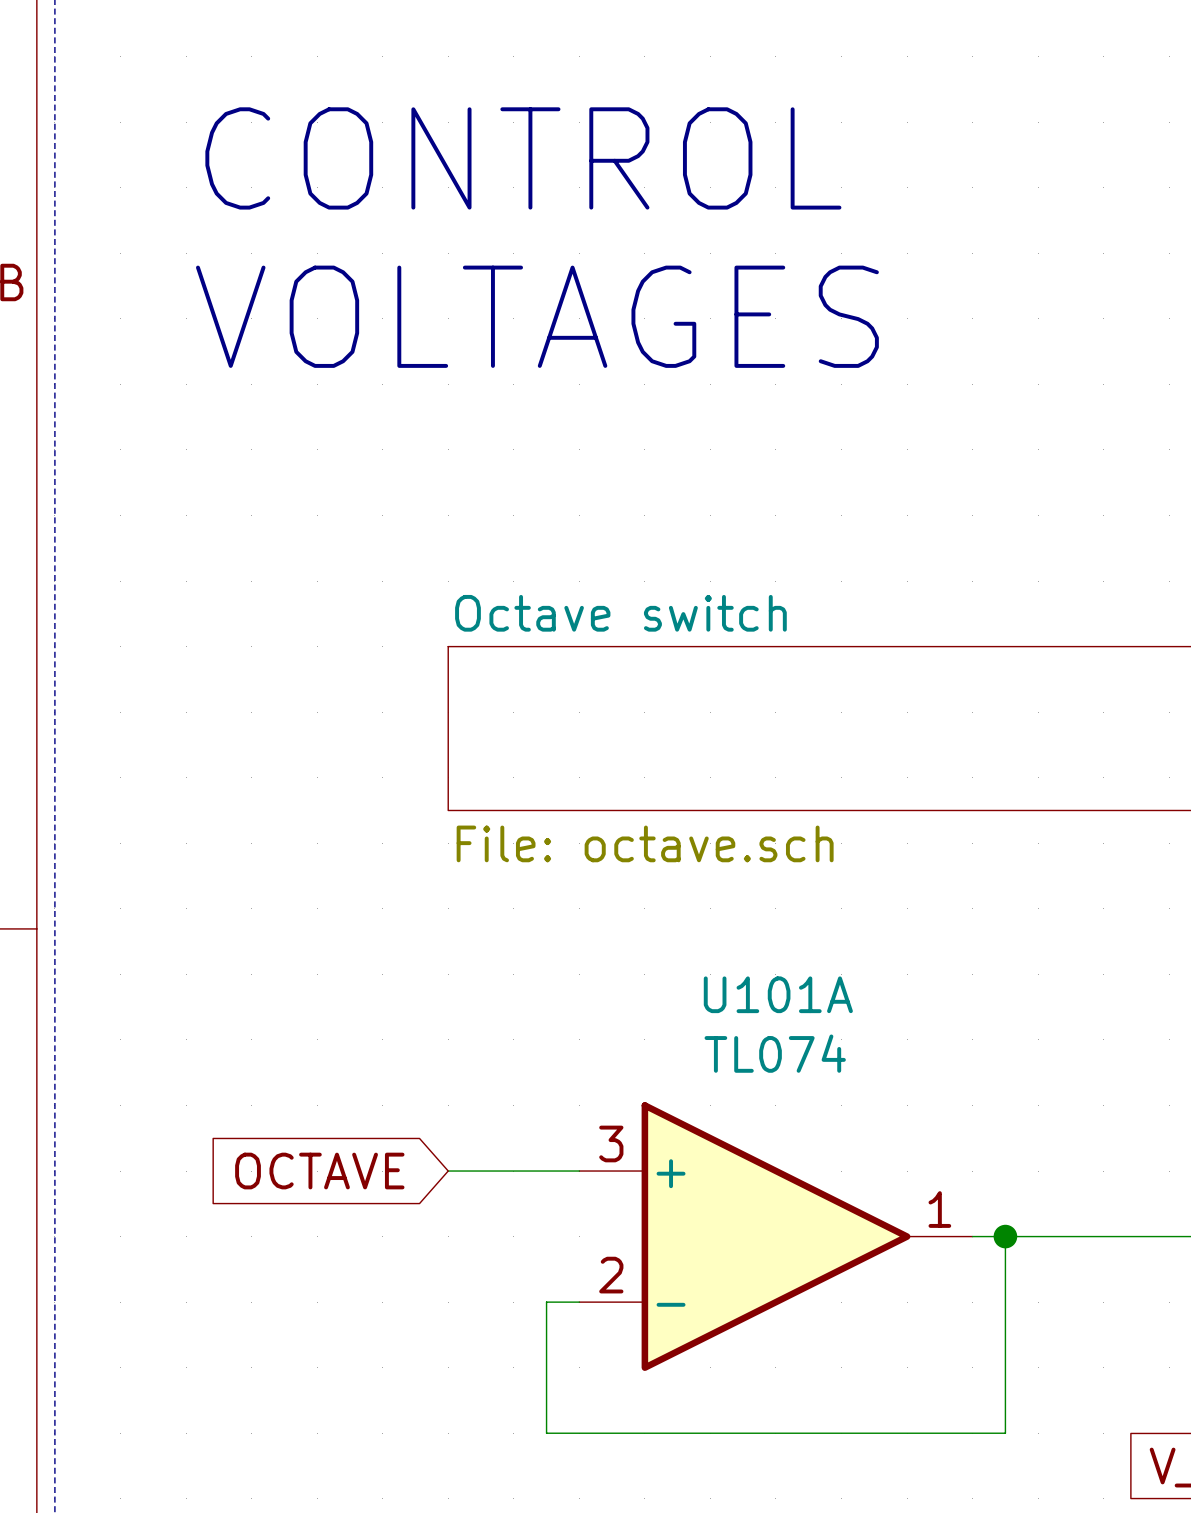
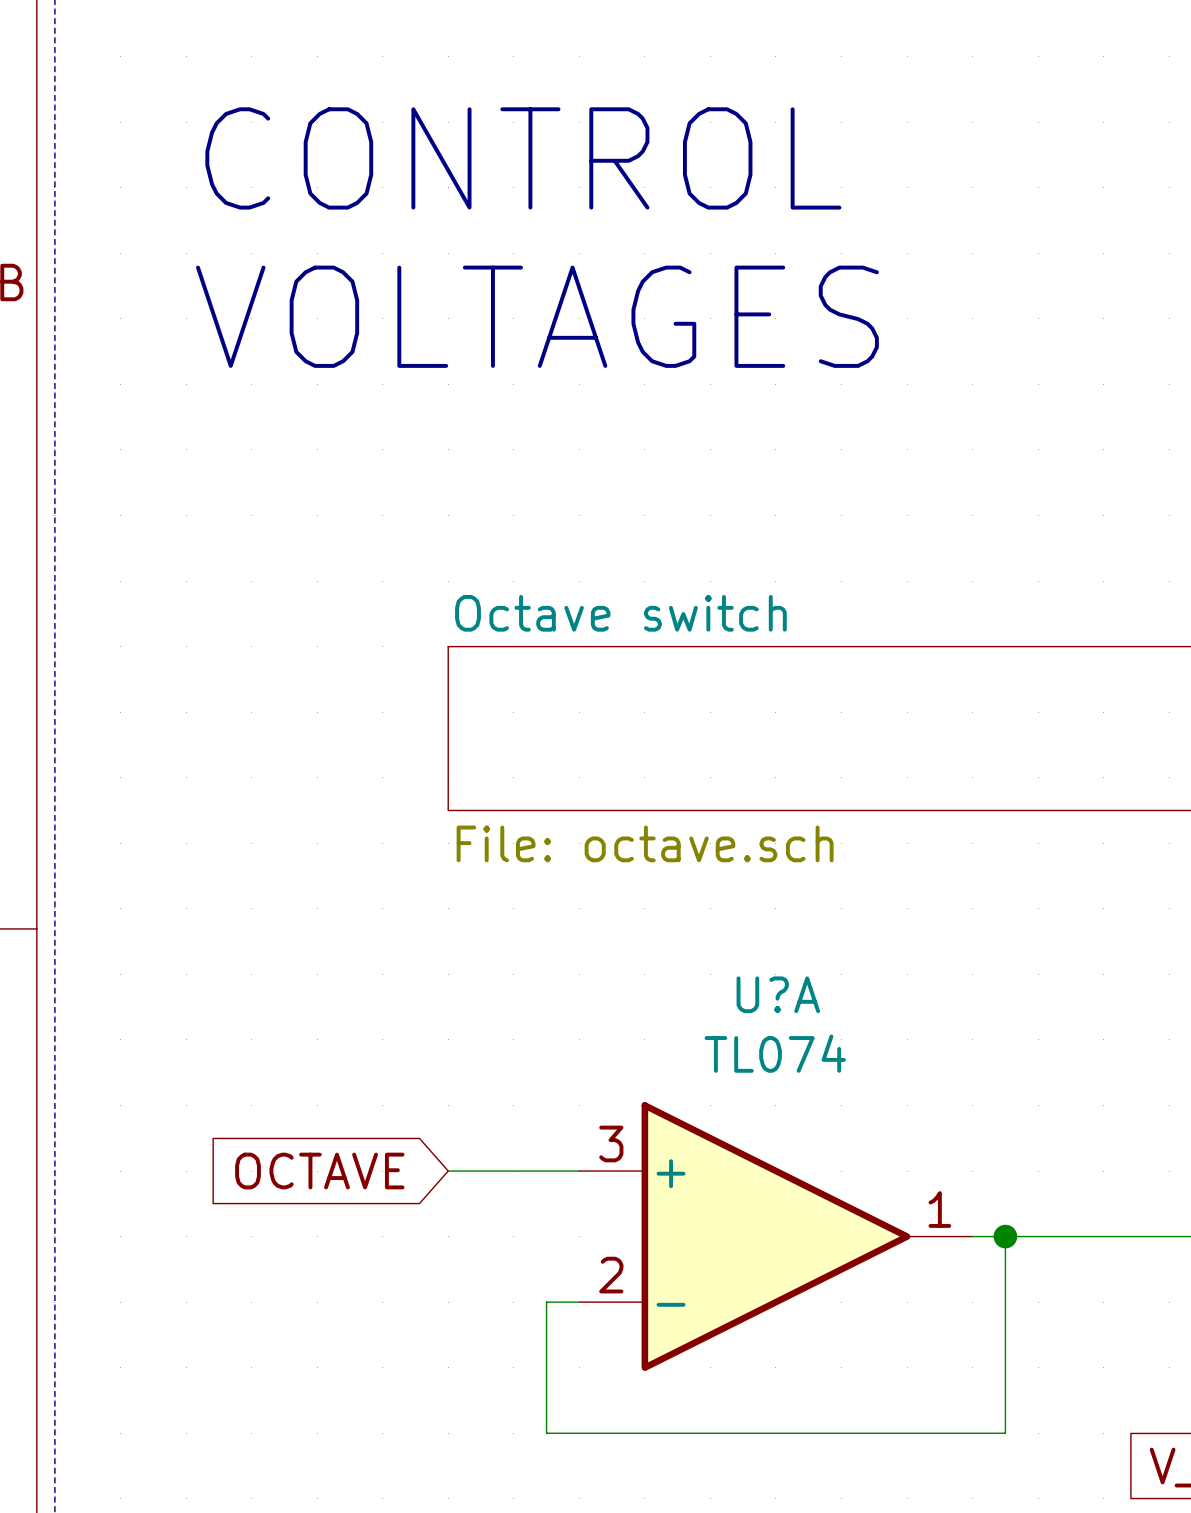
U101A name: U101A (778, 994) -> U?A (778, 994)

